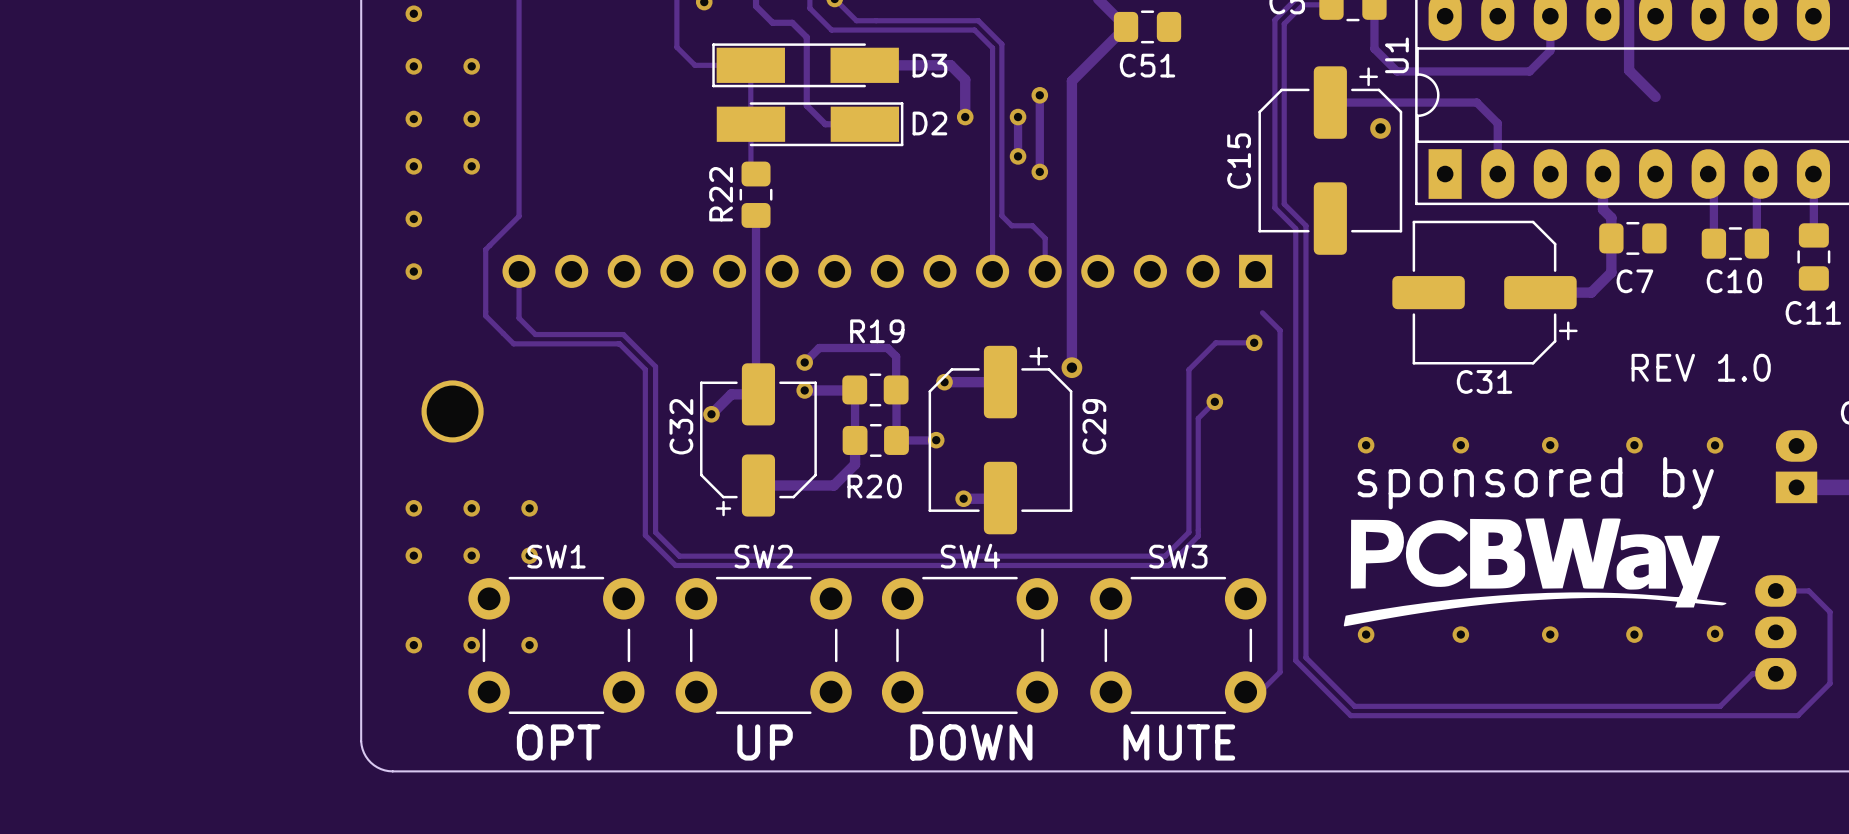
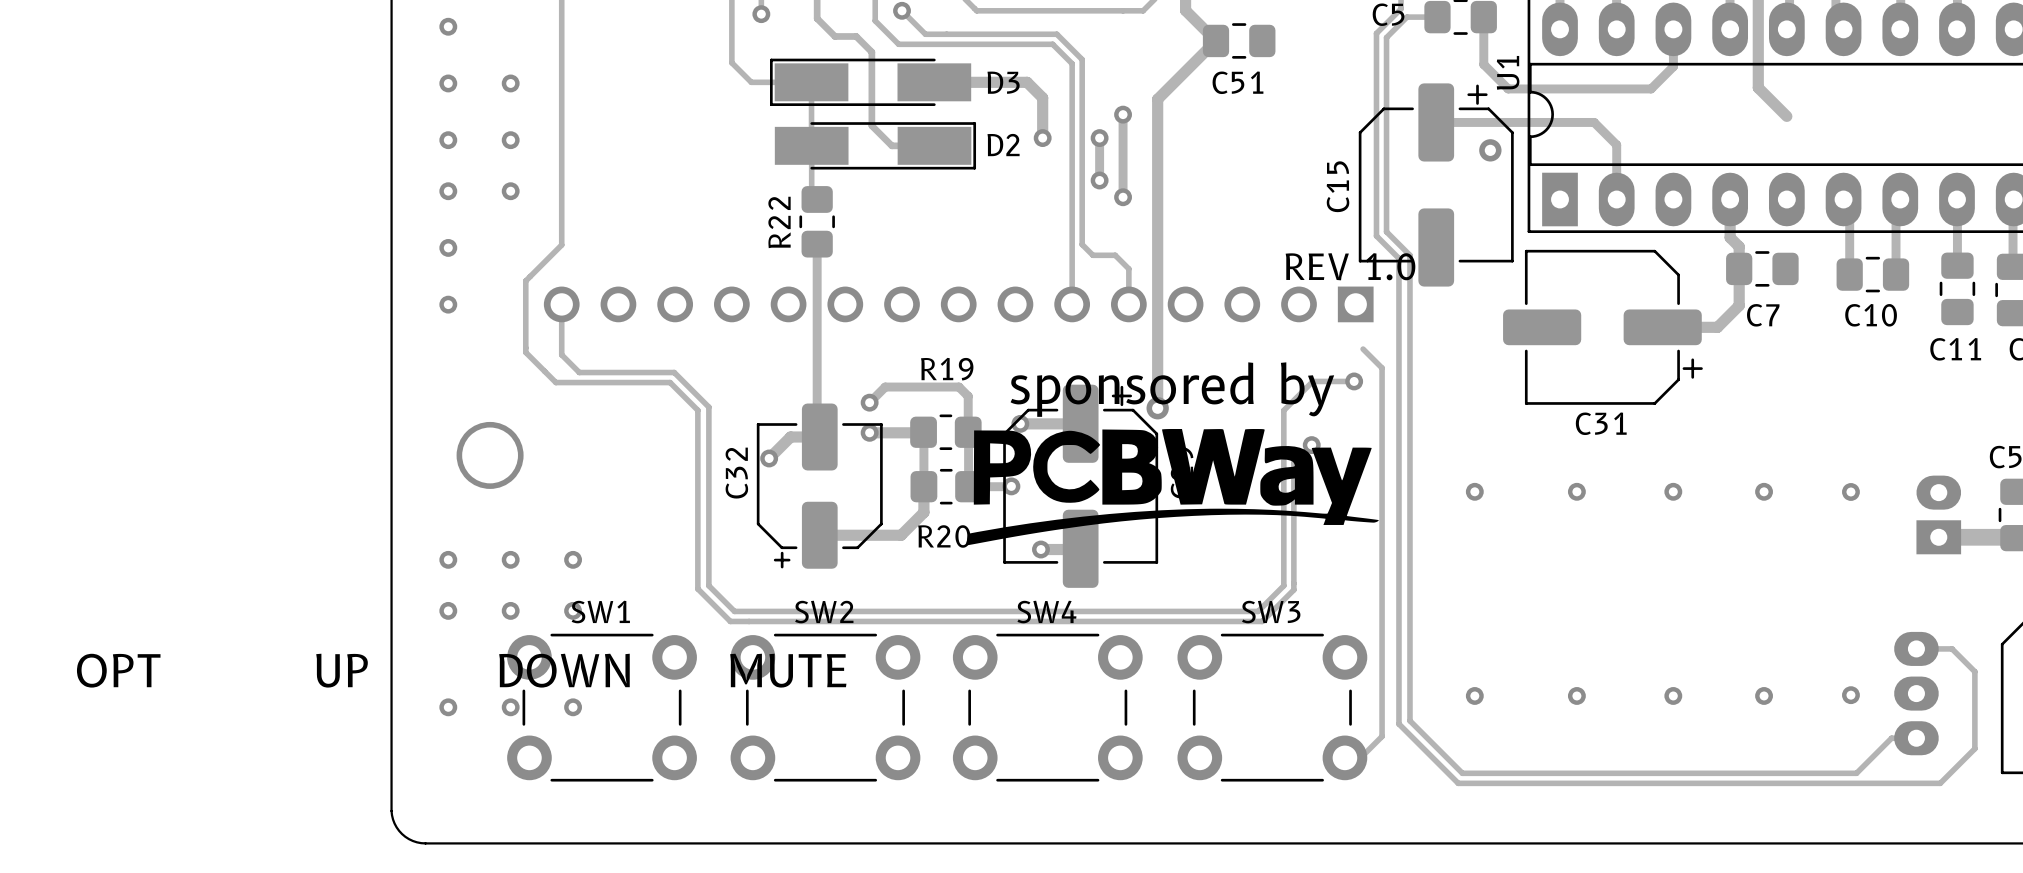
text position: REV 1.0 (1701, 367) -> REV 1.0 (1350, 266)
text position: sponsored by (1535, 483) -> sponsored by (1172, 389)
drawing position: (1535, 572) -> (1172, 487)
text position: OPT (558, 742) -> OPT (118, 670)
text position: UP (765, 742) -> UP (342, 670)
text position: DOWN (971, 742) -> DOWN (564, 670)
text position: MUTE (1179, 742) -> MUTE (788, 670)

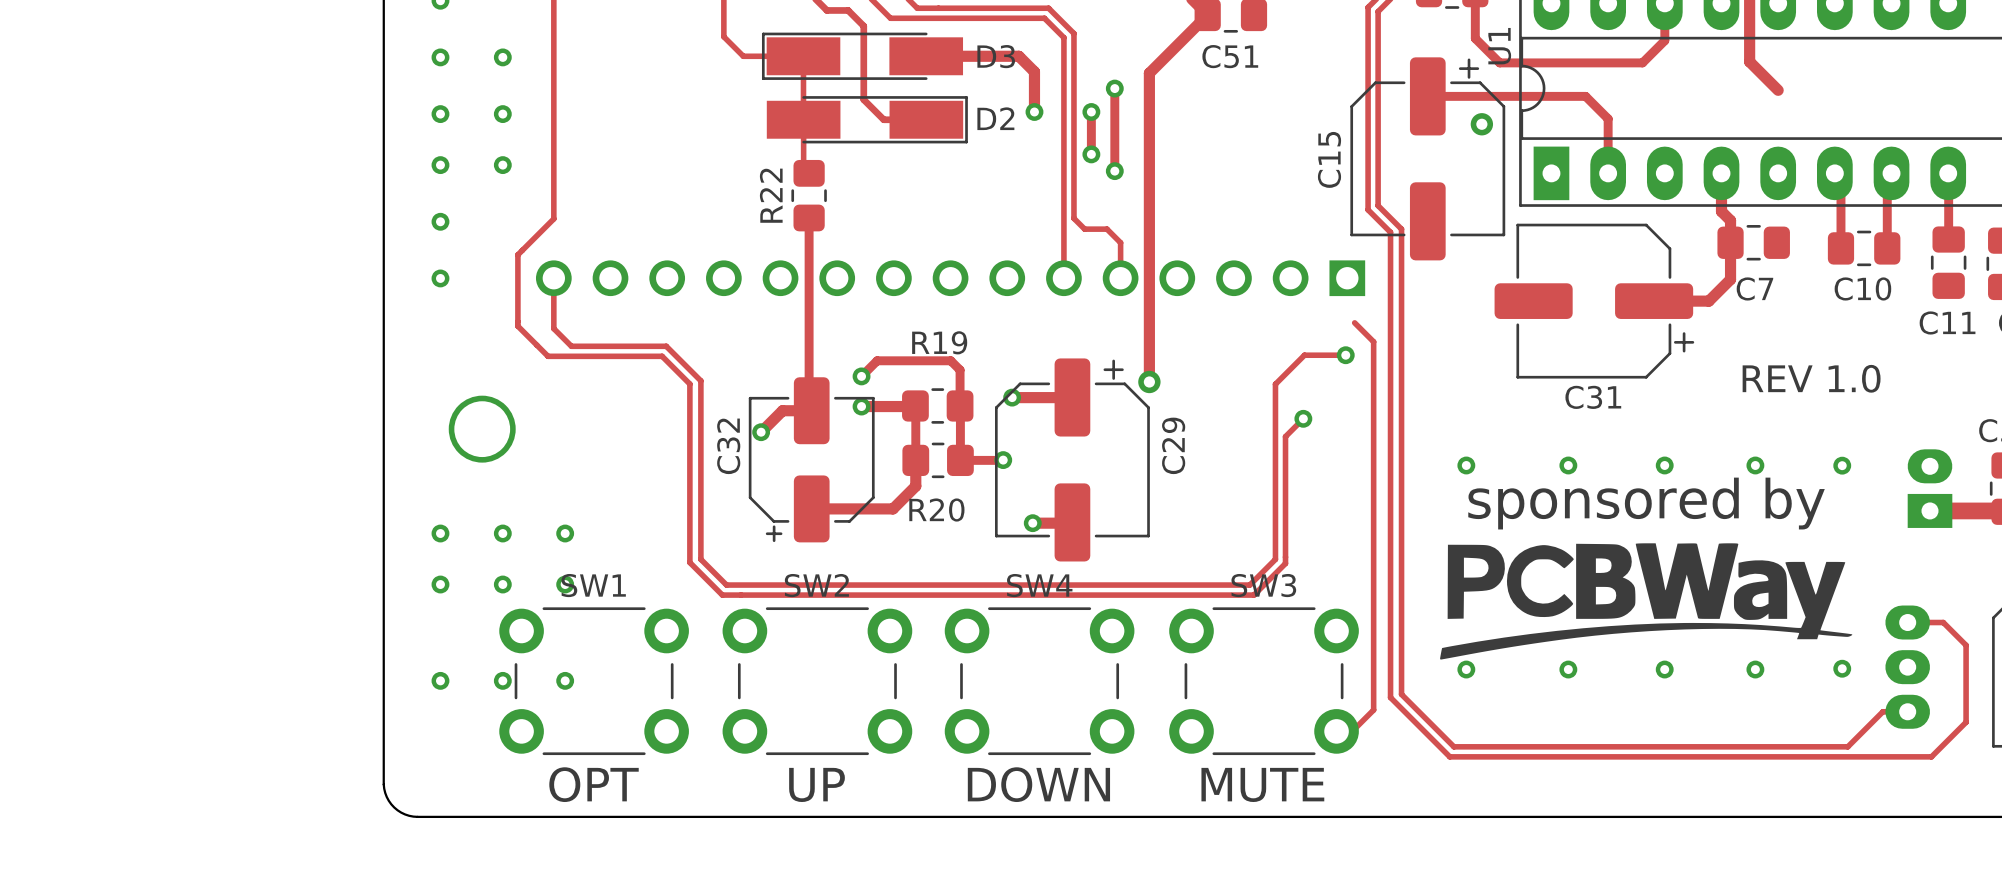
text position: REV 1.0 (1350, 266) -> REV 1.0 (1811, 378)
text position: sponsored by (1172, 389) -> sponsored by (1646, 503)
drawing position: (1172, 487) -> (1646, 601)
text position: OPT (118, 670) -> OPT (594, 784)
text position: UP (342, 670) -> UP (817, 784)
text position: DOWN (564, 670) -> DOWN (1038, 784)
text position: MUTE (788, 670) -> MUTE (1262, 784)

